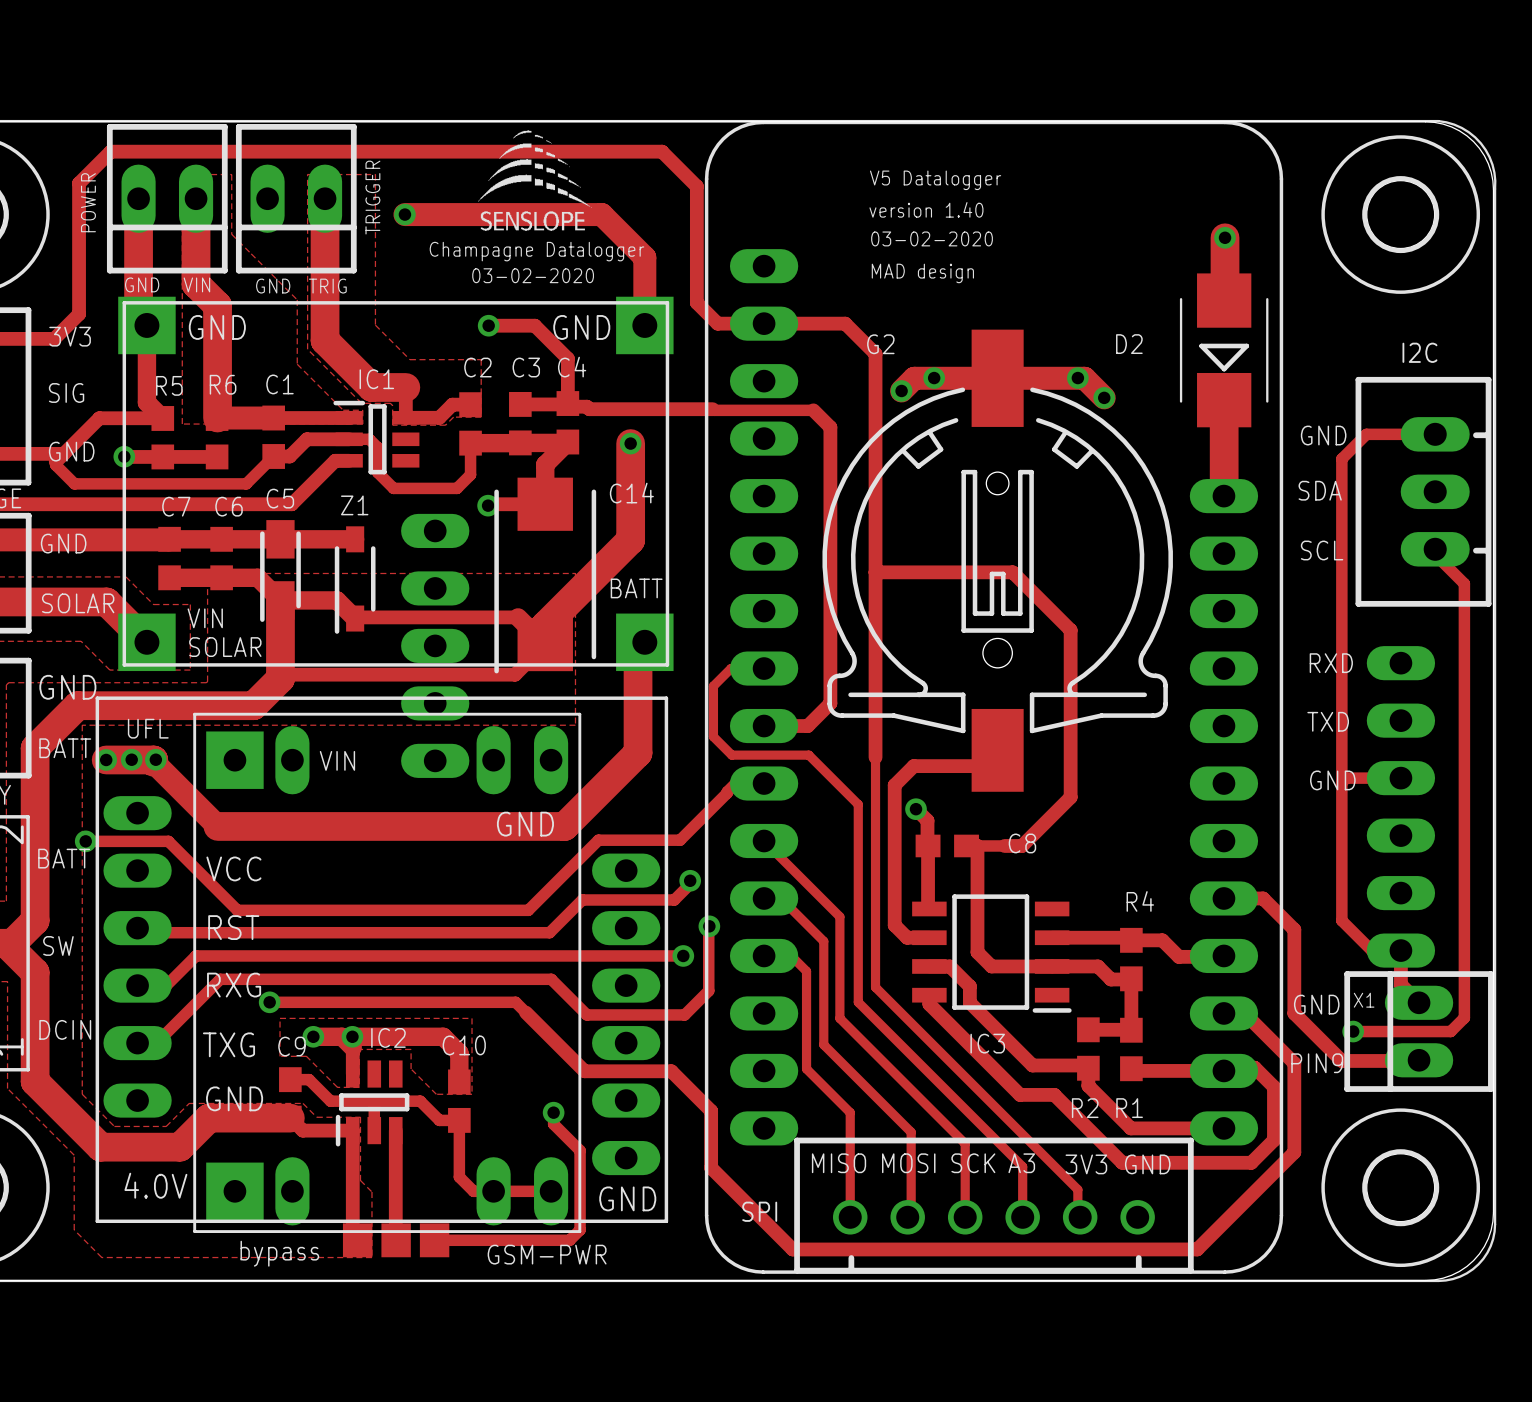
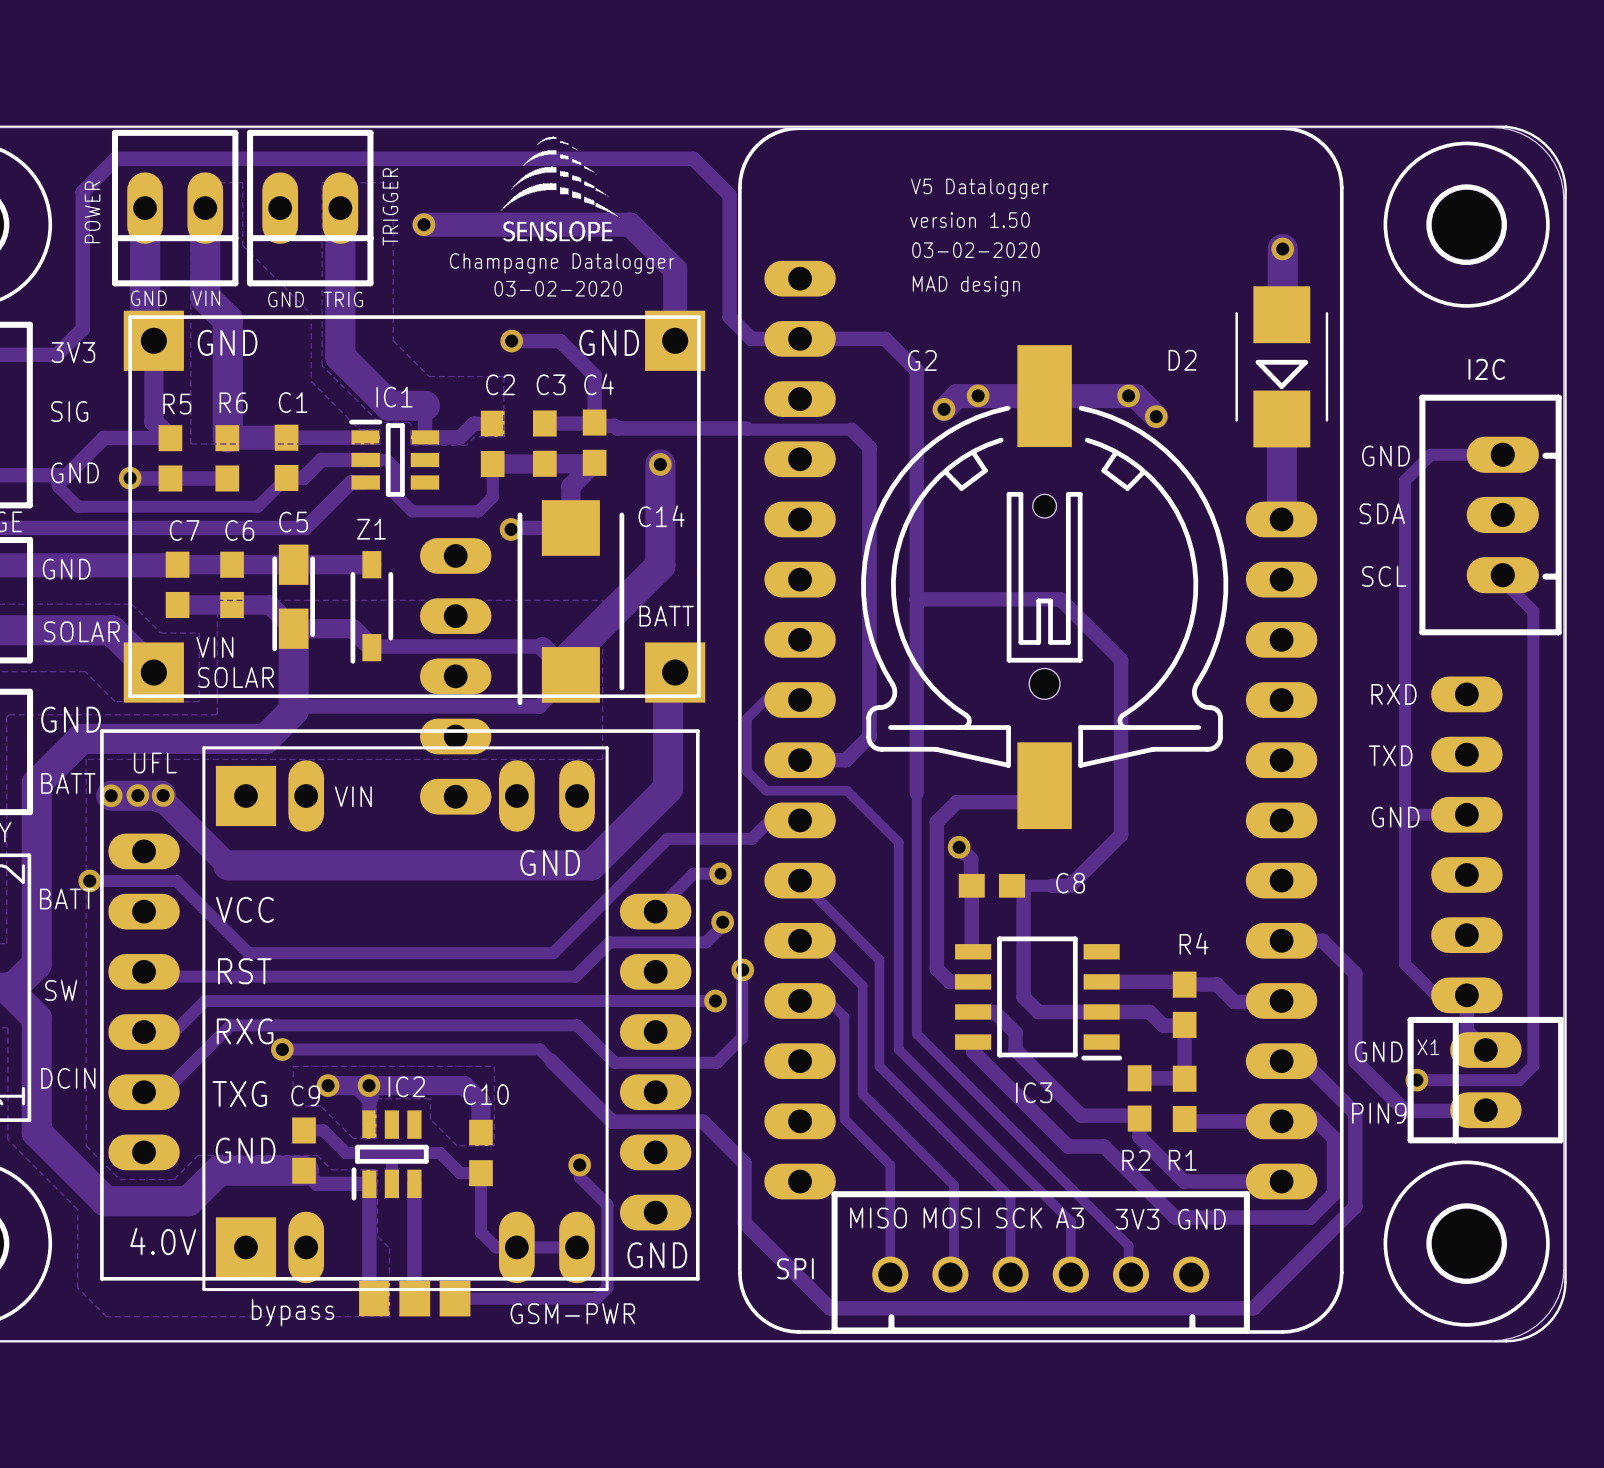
text: version 1.40 (926, 209) -> version 1.50 (970, 220)
track: (727, 791) (680, 840) (598, 840) -> (761, 829) (751, 838) (667, 838) (626, 879)
track: none -> (720, 873) (693, 873) (655, 911)
via: none -> (720, 873)

